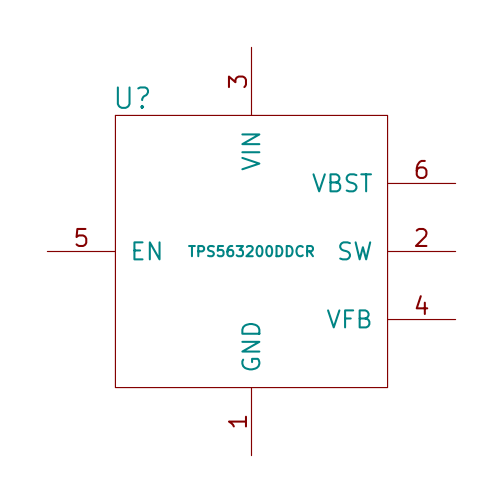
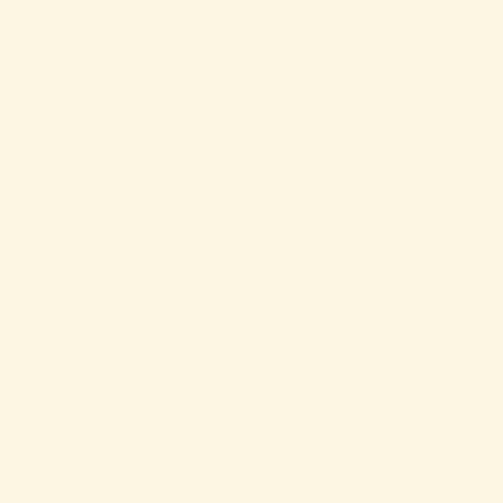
U?: TPS563200DDCR (251, 251) -> none

